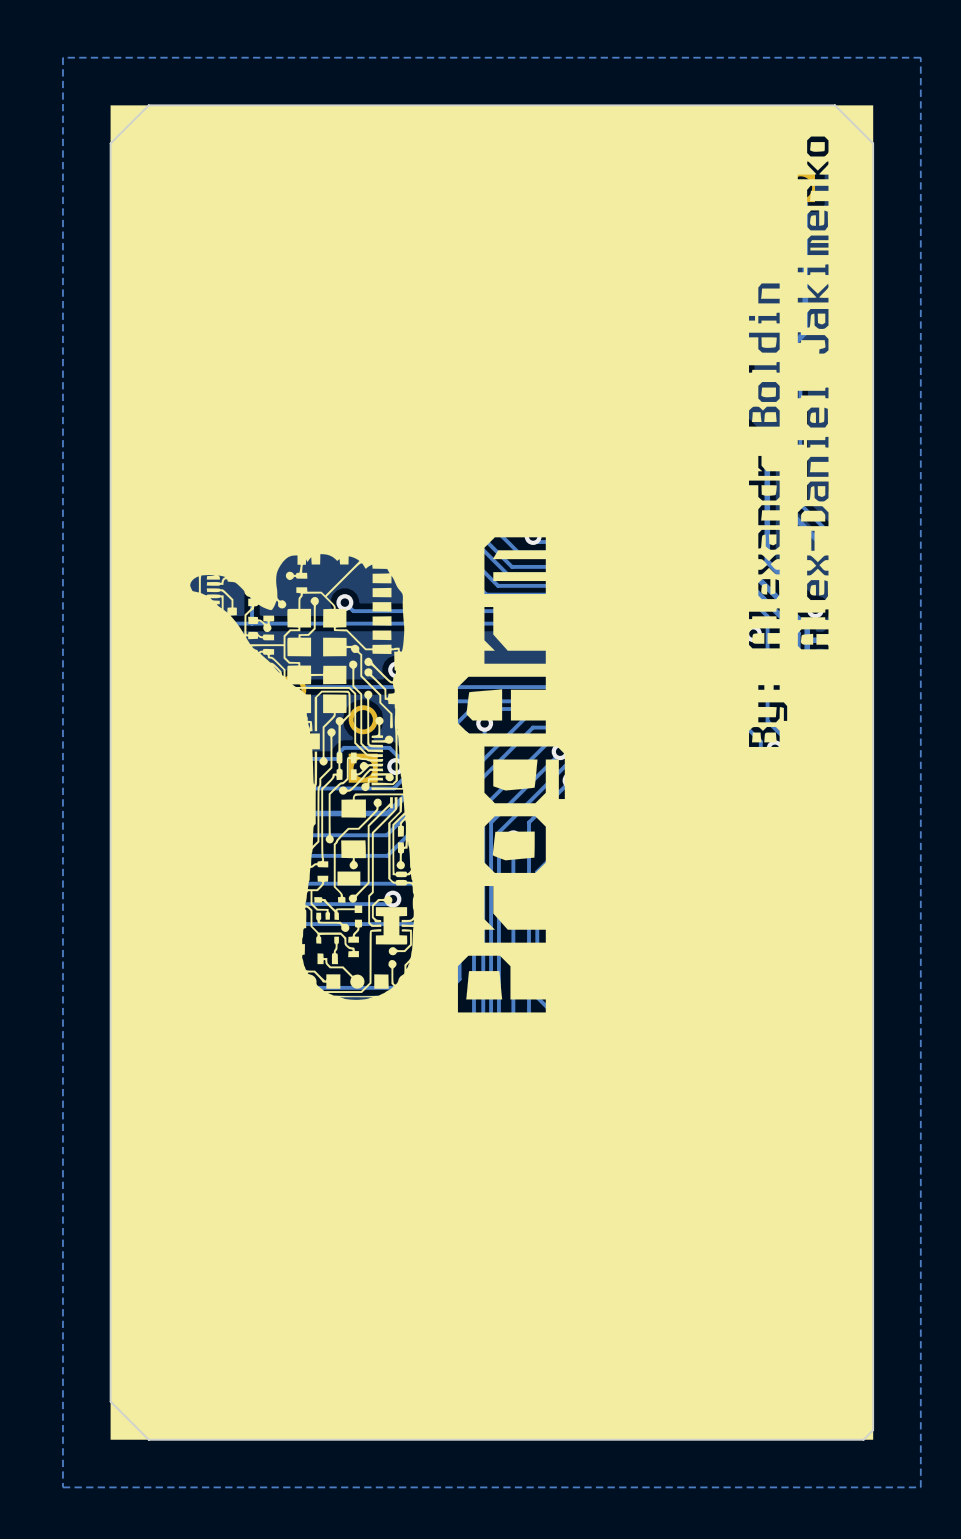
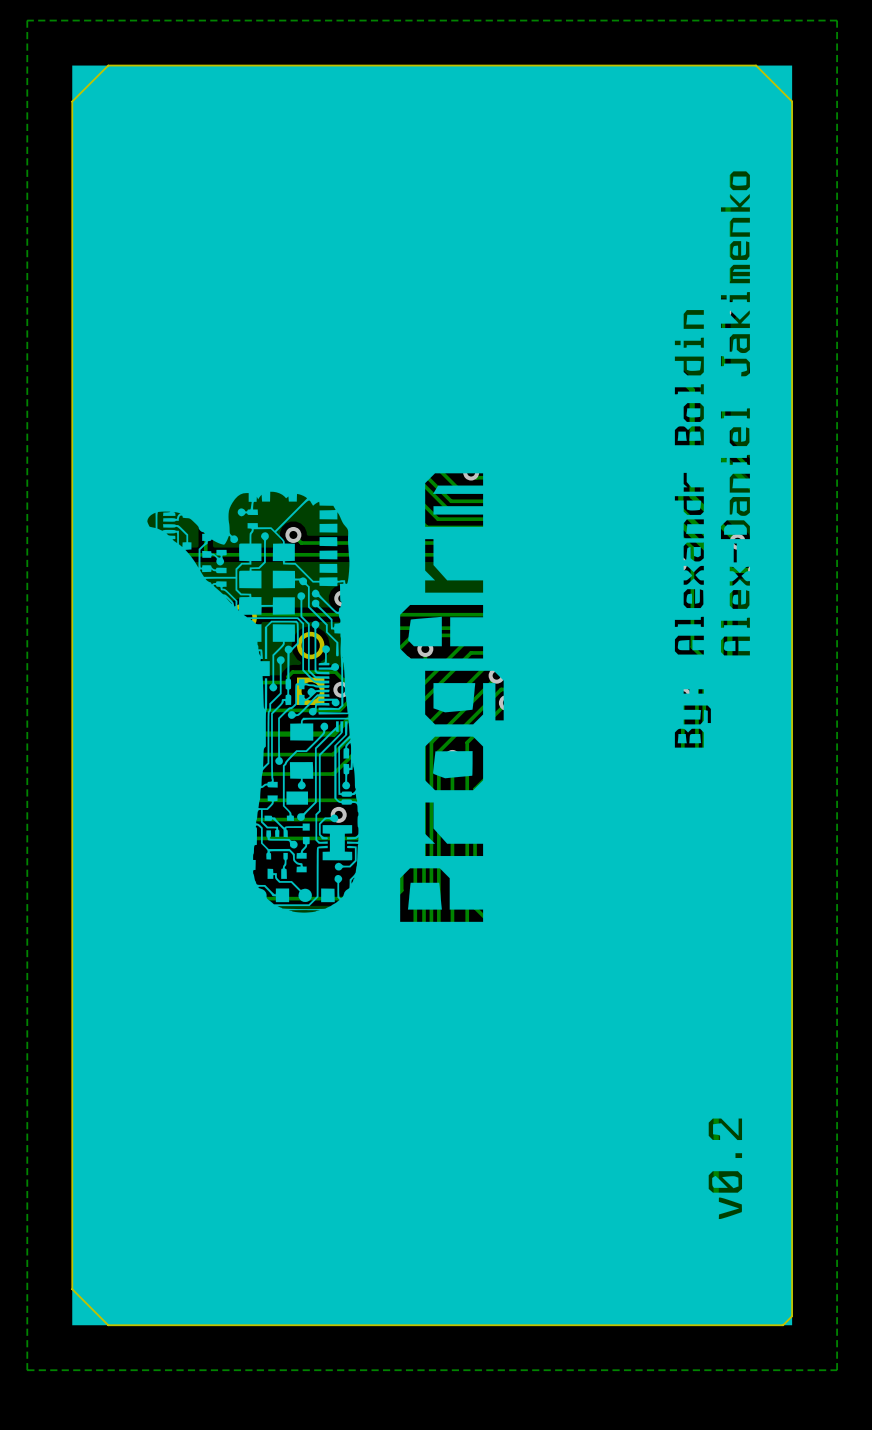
drawing shape: [110, 105, 874, 1440] -> [72, 65, 793, 1326]

